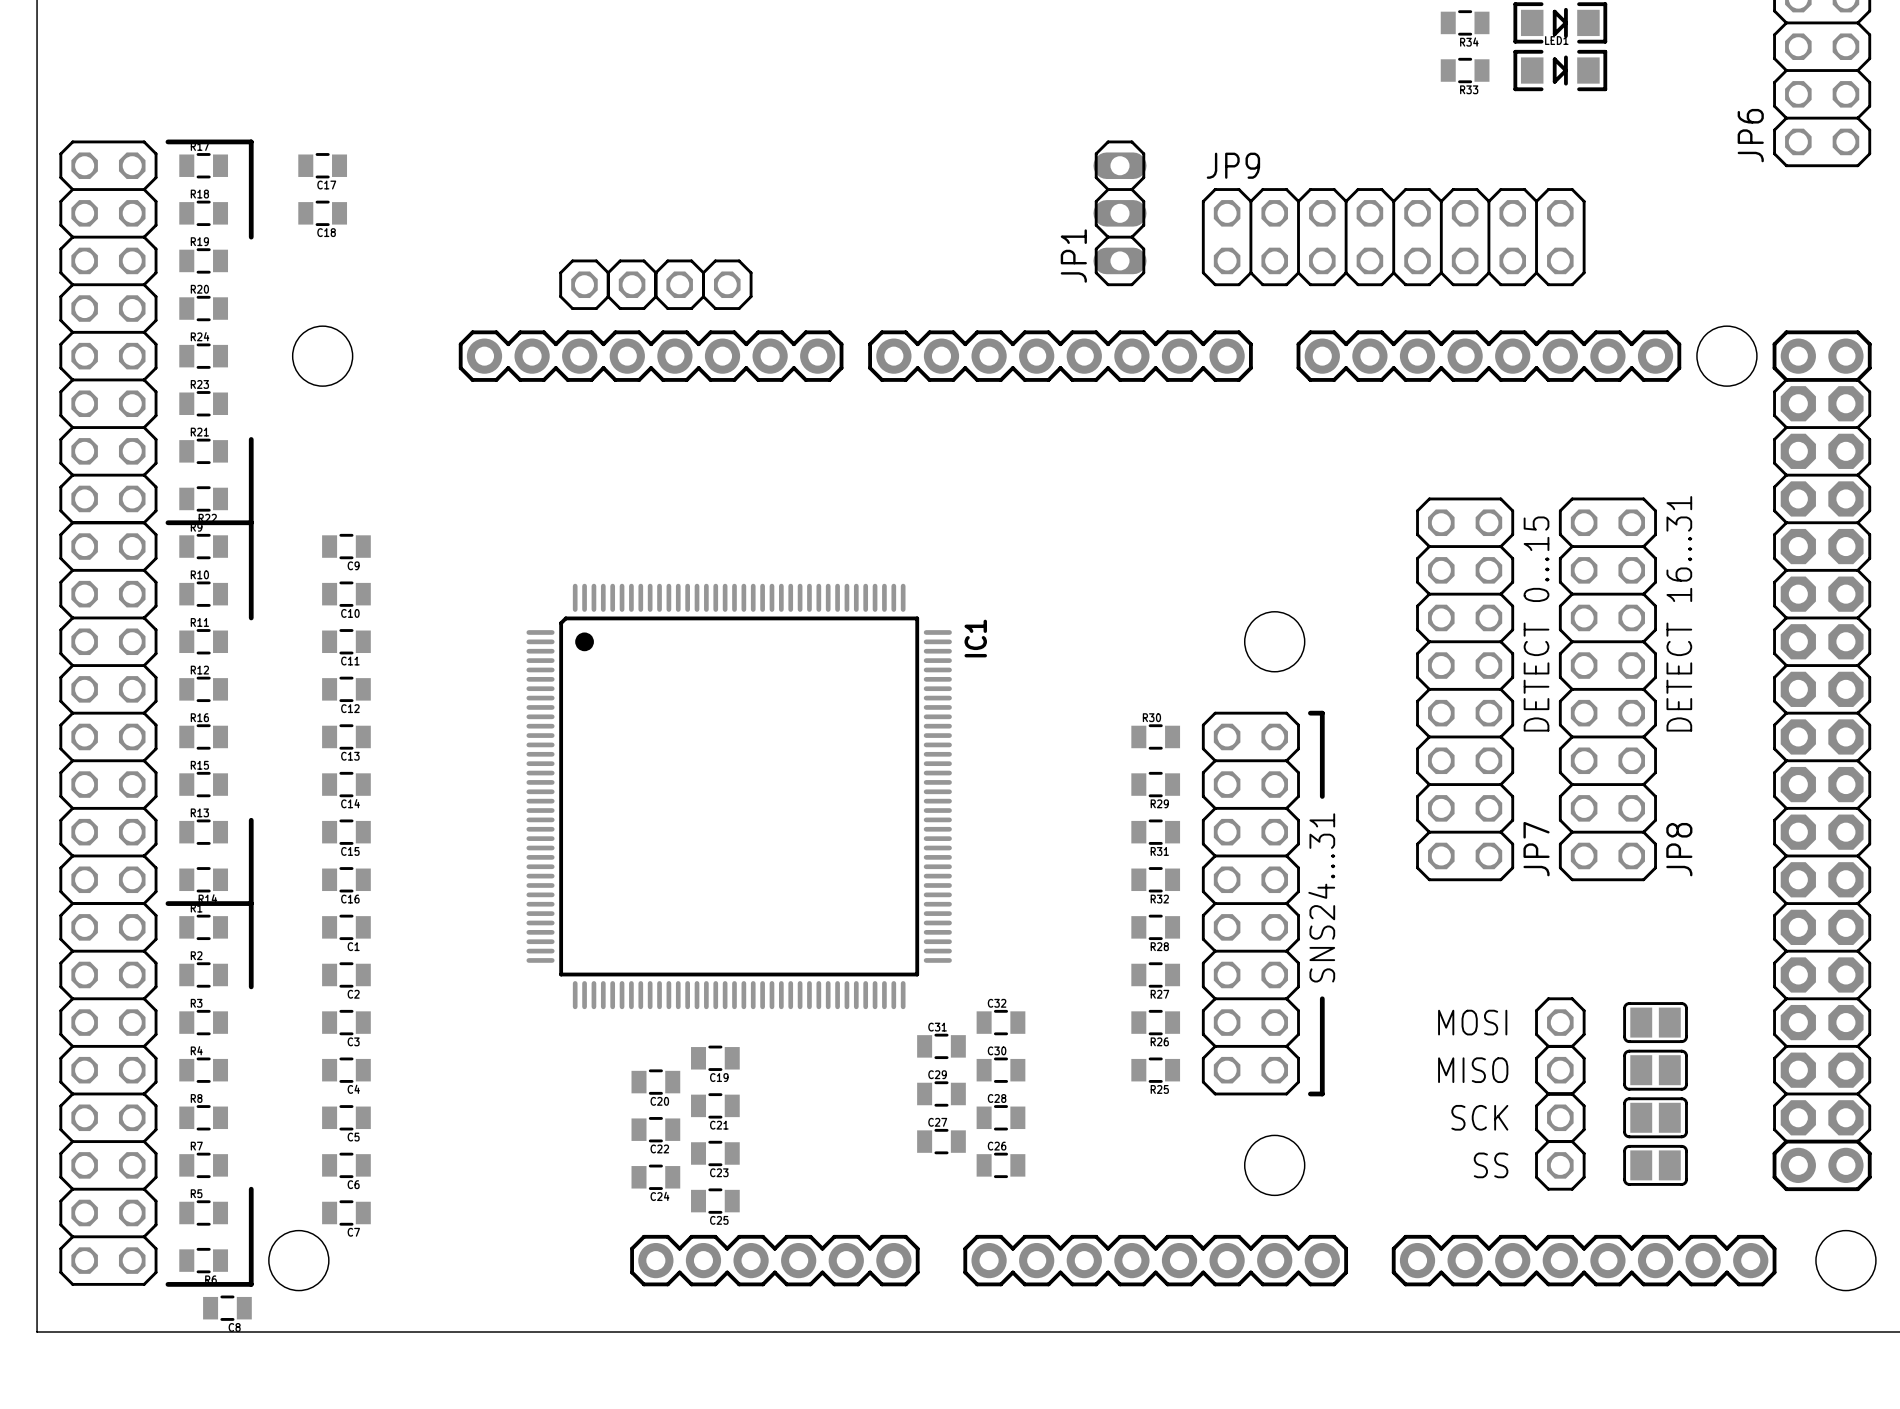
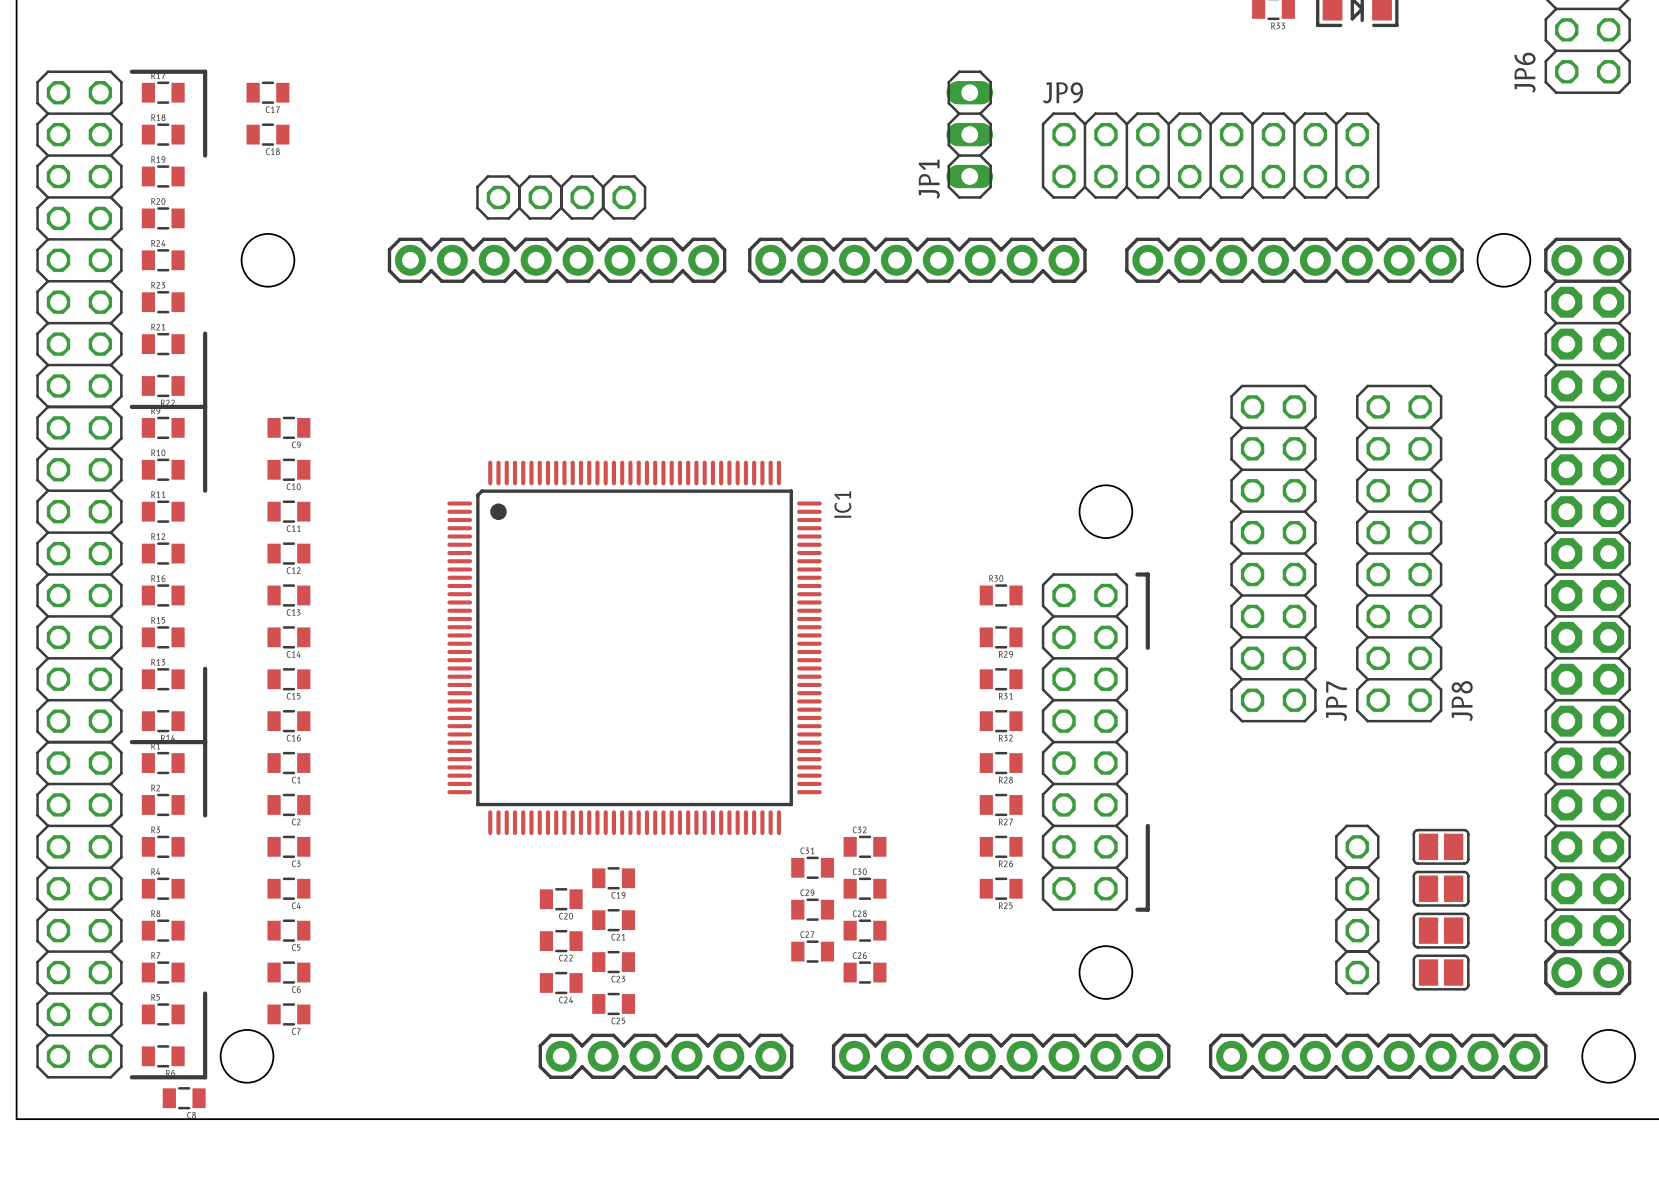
JP8 value: DETECT 16...31 (1679, 613) -> none
JP7 value: DETECT 0...15 (1536, 624) -> none
part value: SNS24...31 (1321, 897) -> none
part value: MOSI (1472, 1022) -> none
part value: MISO (1473, 1070) -> none
part value: SCK (1479, 1117) -> none
part value: SS (1491, 1165) -> none

